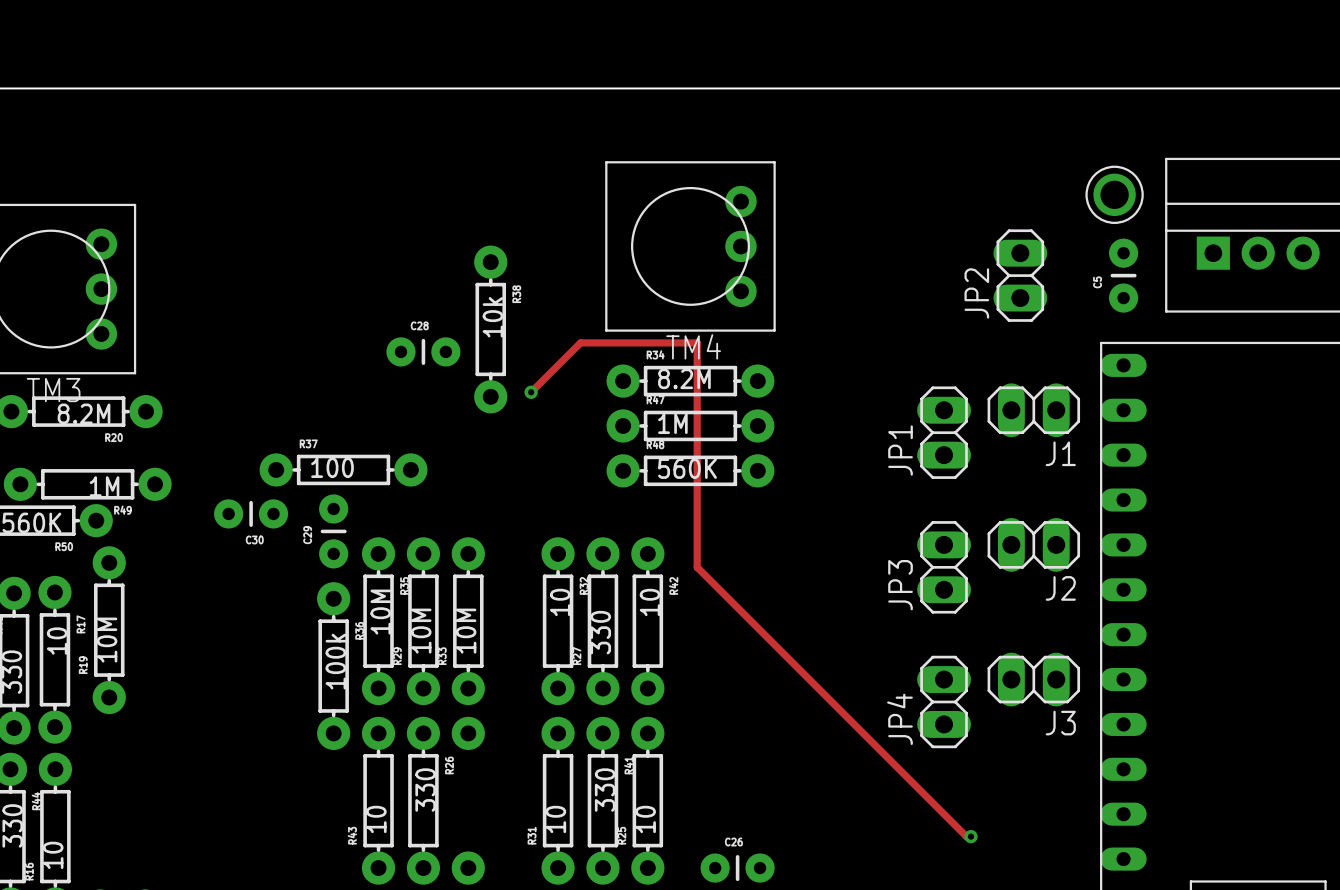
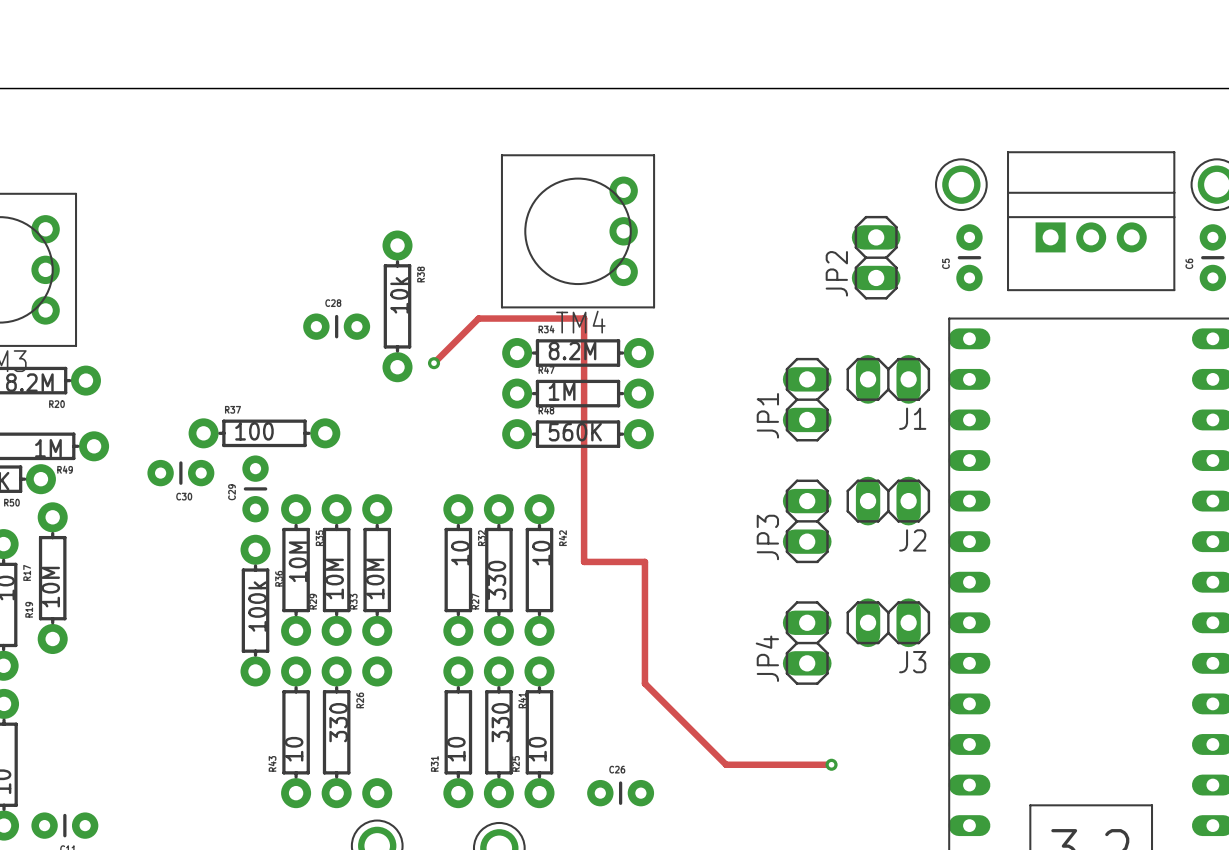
track: (697, 567) (966, 836) -> (584, 521) (584, 561) (644, 561) (644, 683) (726, 764) (827, 764)

